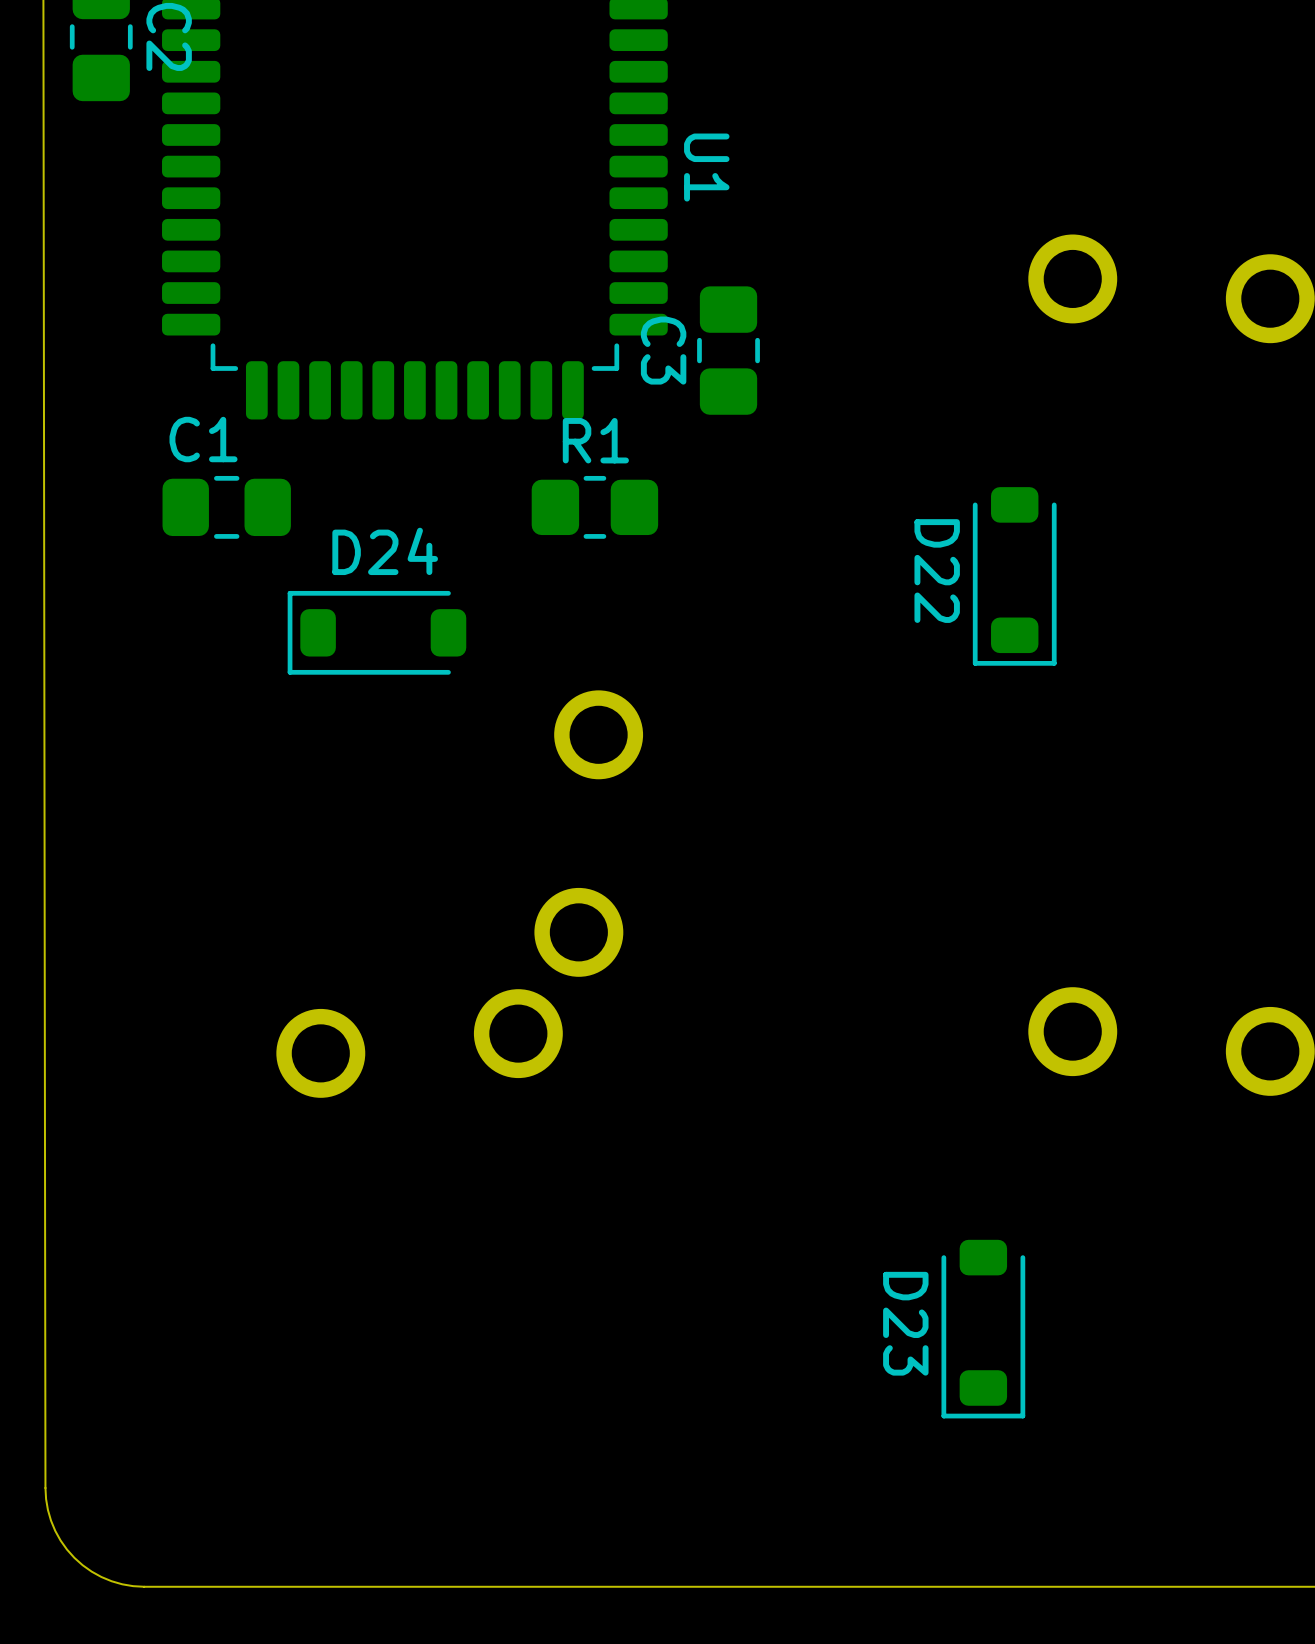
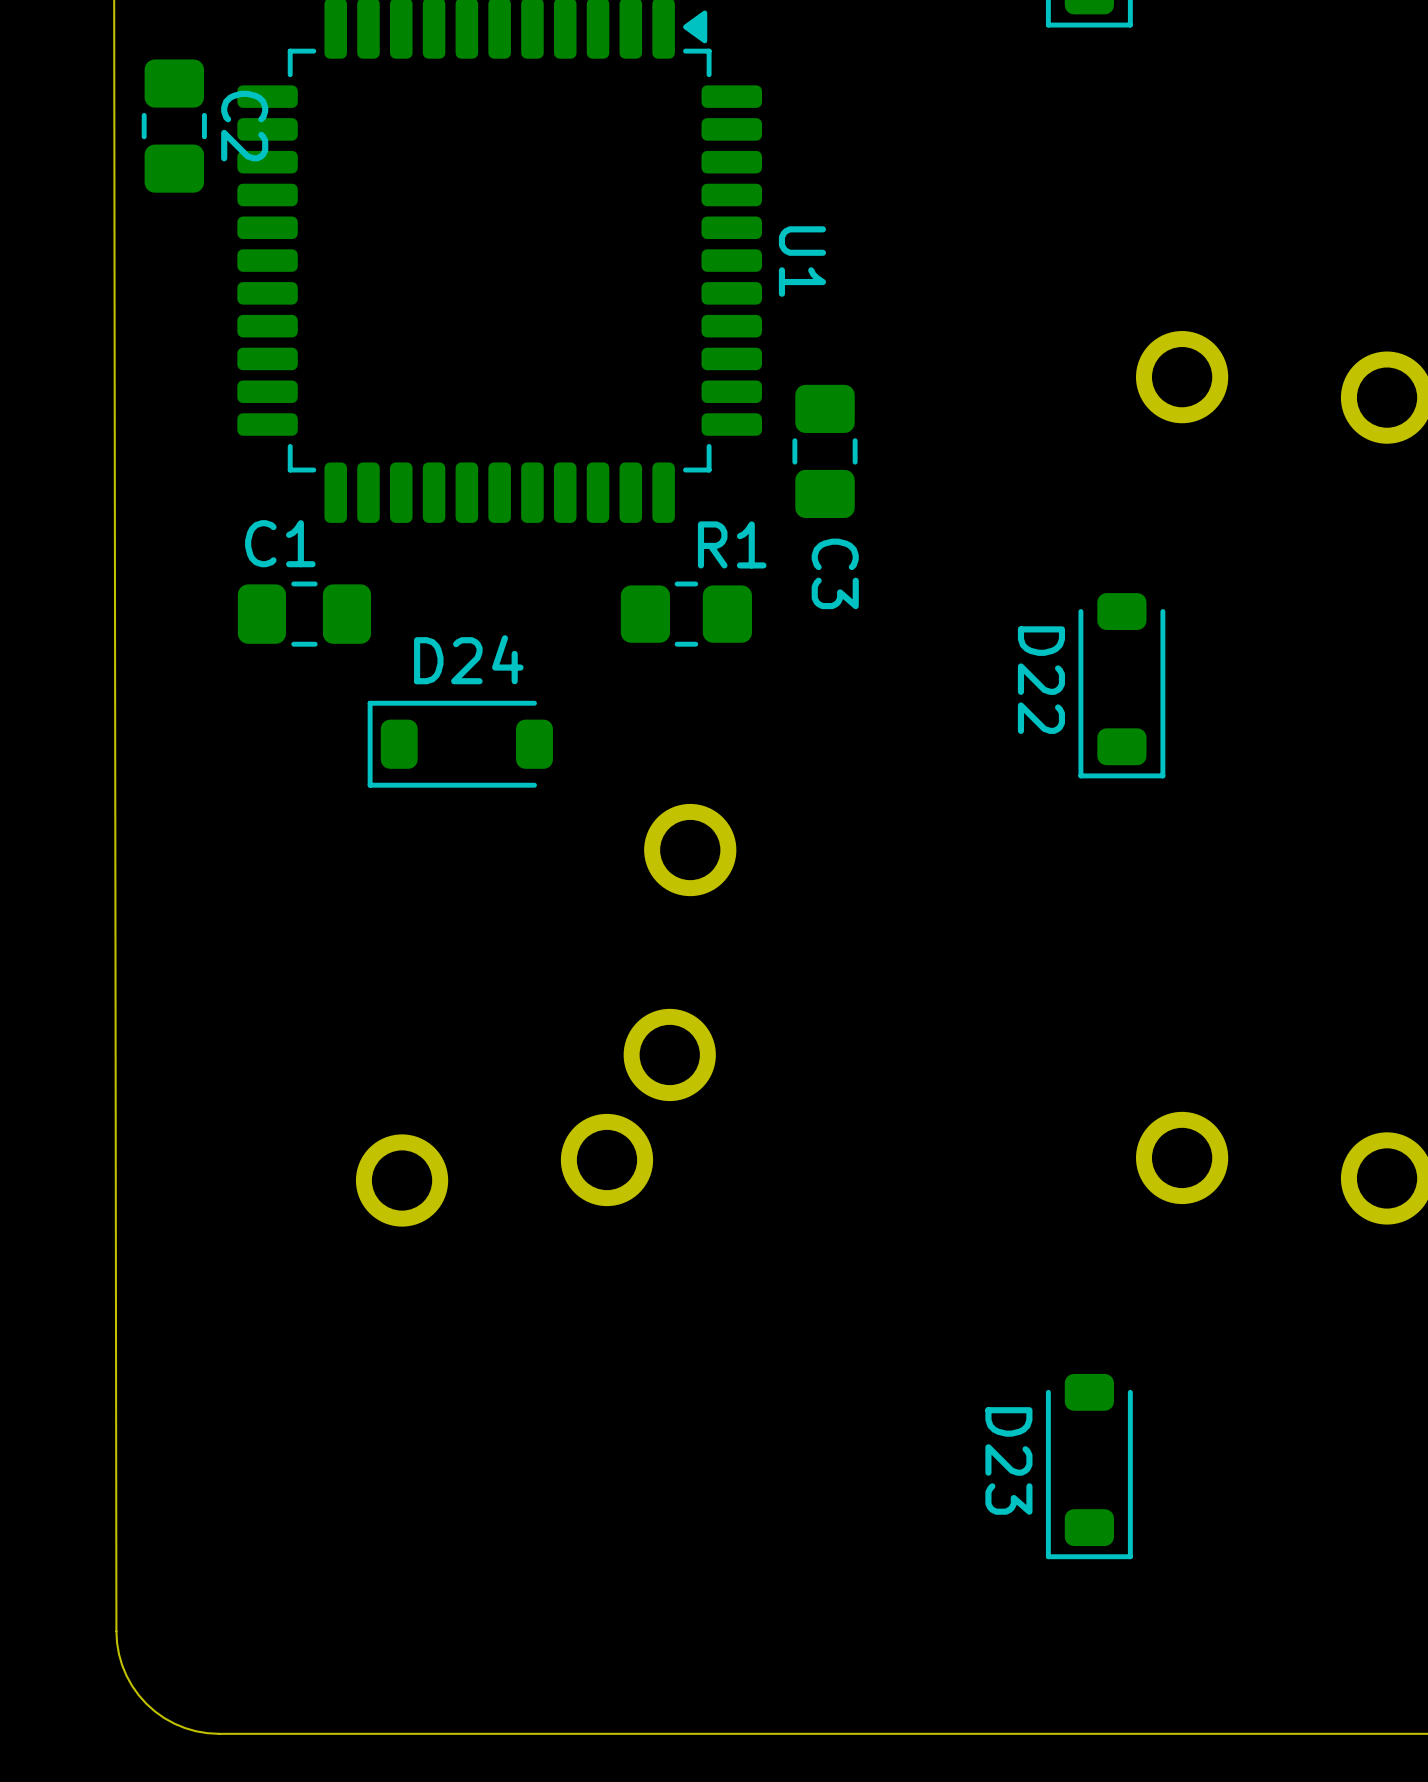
C3 name position: C3 (663, 350) -> C3 (835, 573)
R1 name position: R1 (595, 440) -> R1 (732, 544)

